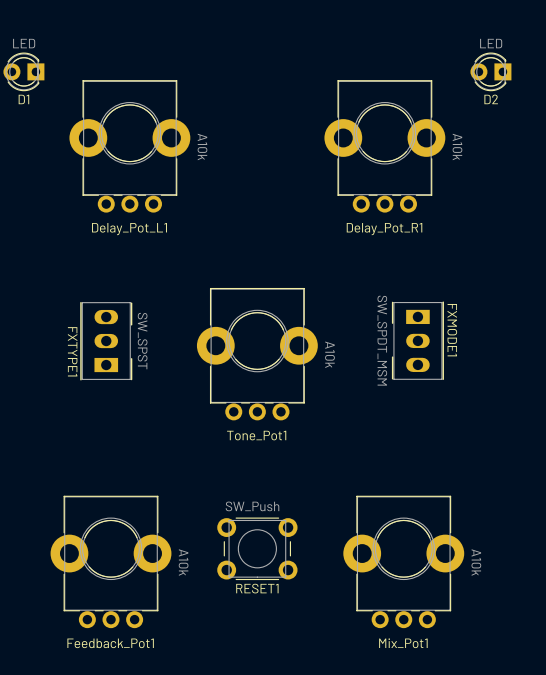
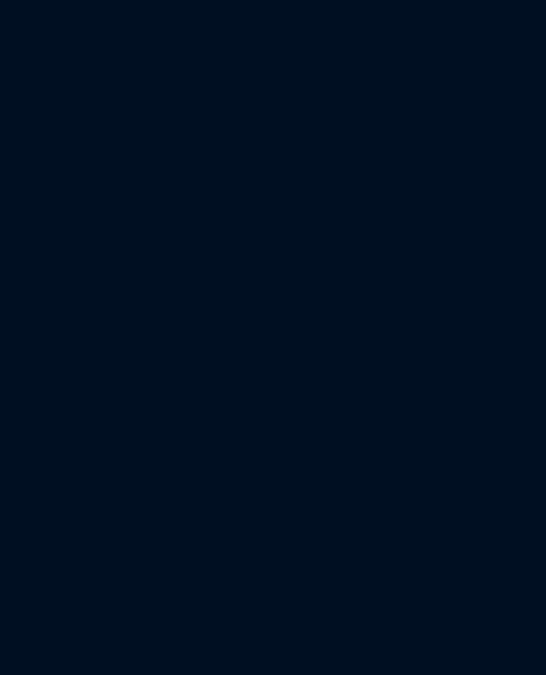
D1: LED (23, 71) -> none
D2: LED (490, 71) -> none
Delay_Pot_L1: A10k (129, 146) -> none
Delay_Pot_R1: A10k (384, 146) -> none
FXMODE1: SW_SPDT_MSM (417, 340) -> none
FXTYPE1: SW_SPST (106, 341) -> none
Tone_Pot1: A10k (257, 354) -> none
RESET1: SW_Push (257, 548) -> none
Feedback_Pot1: A10k (111, 561) -> none
Mix_Pot1: A10k (403, 561) -> none

